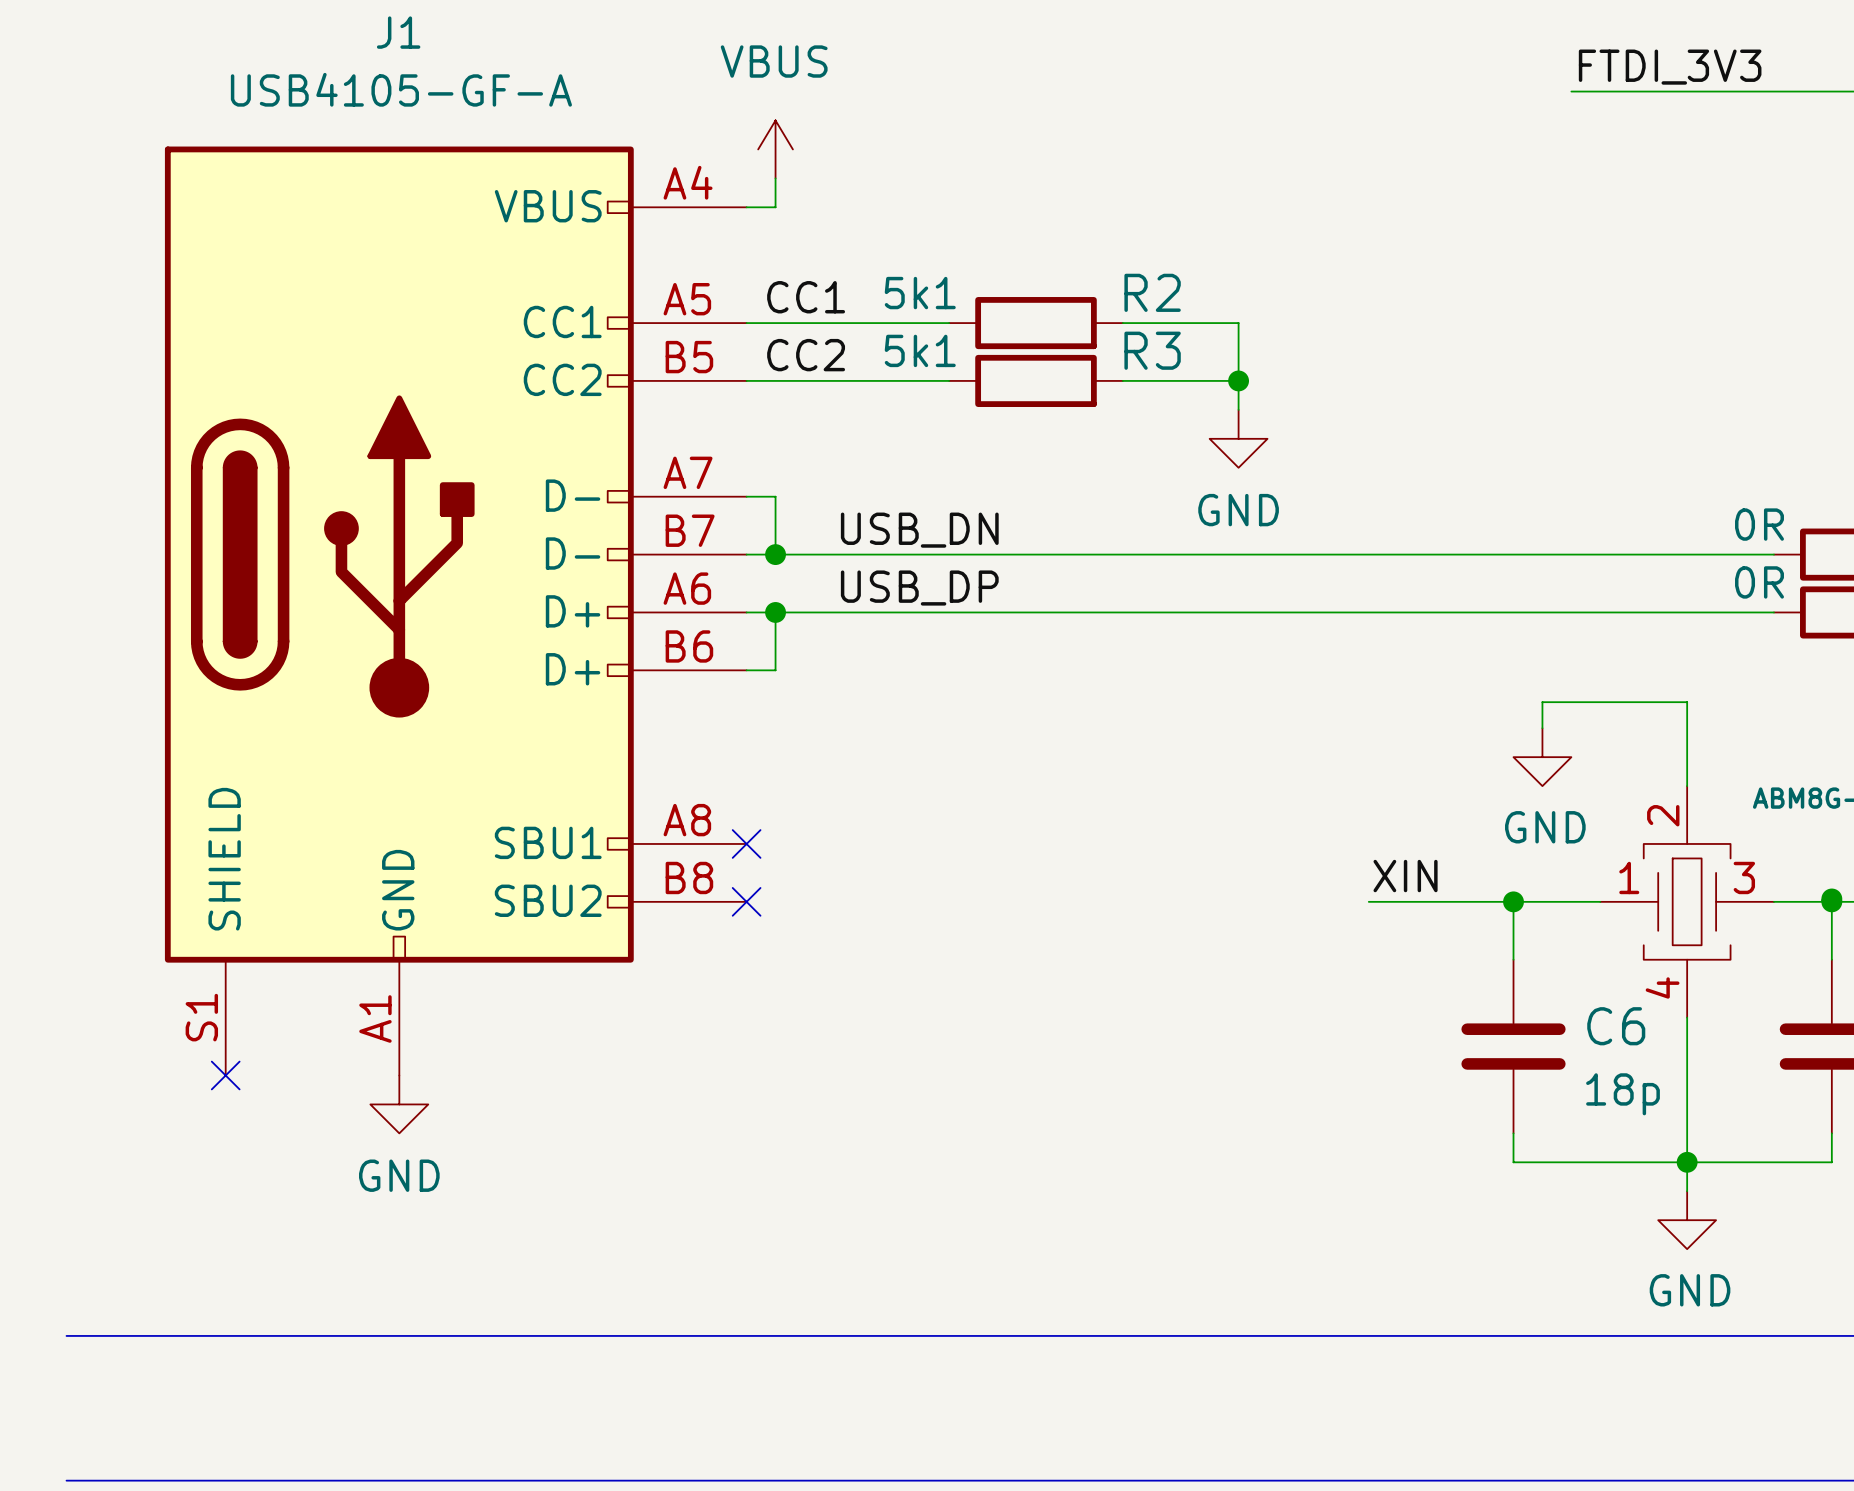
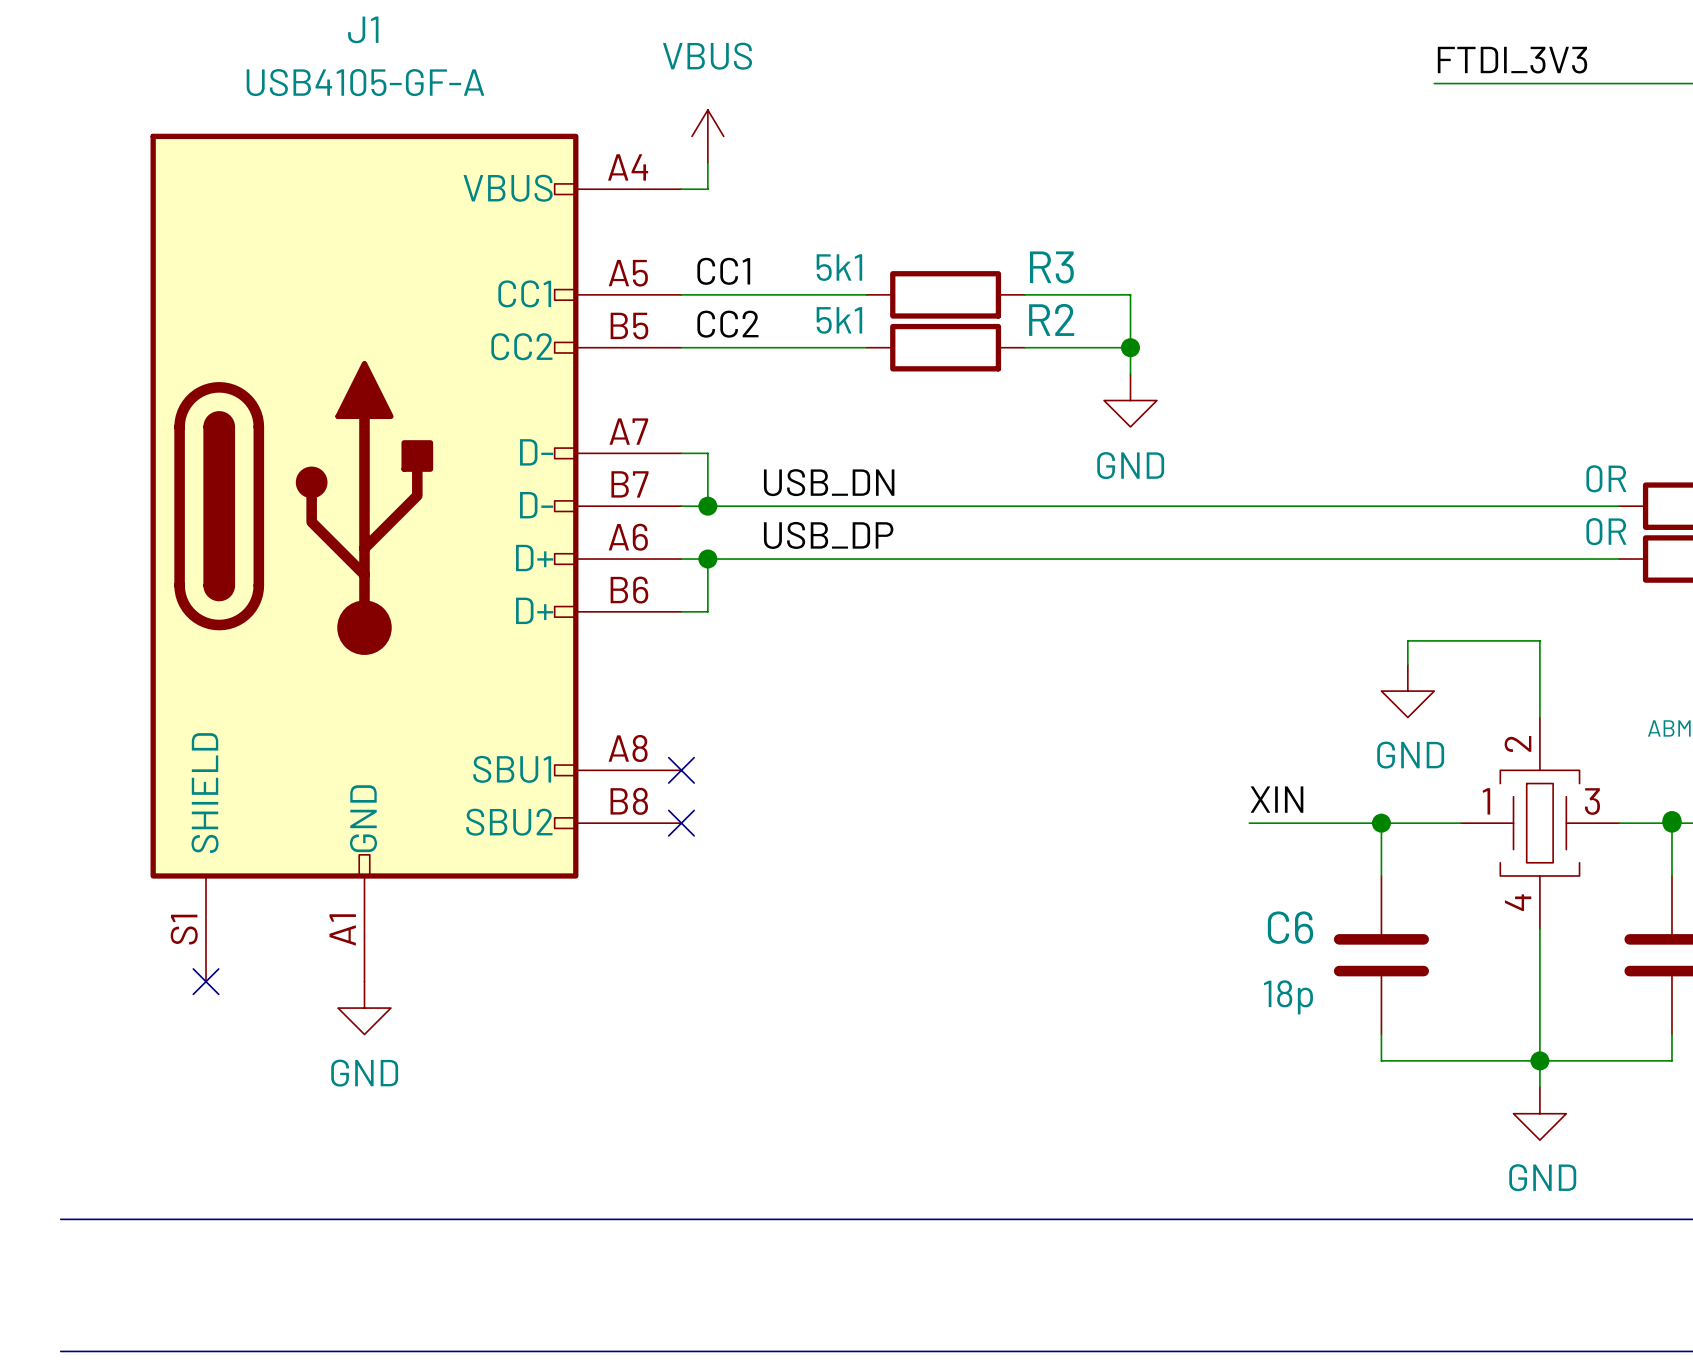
R2 name position: R2 (1152, 292) -> R2 (1051, 319)
R3 name position: R3 (1152, 350) -> R3 (1051, 267)
C6 name position: C6 (1616, 1026) -> C6 (1290, 927)
C6 text position: 18p (1623, 1094) -> 18p (1288, 997)

